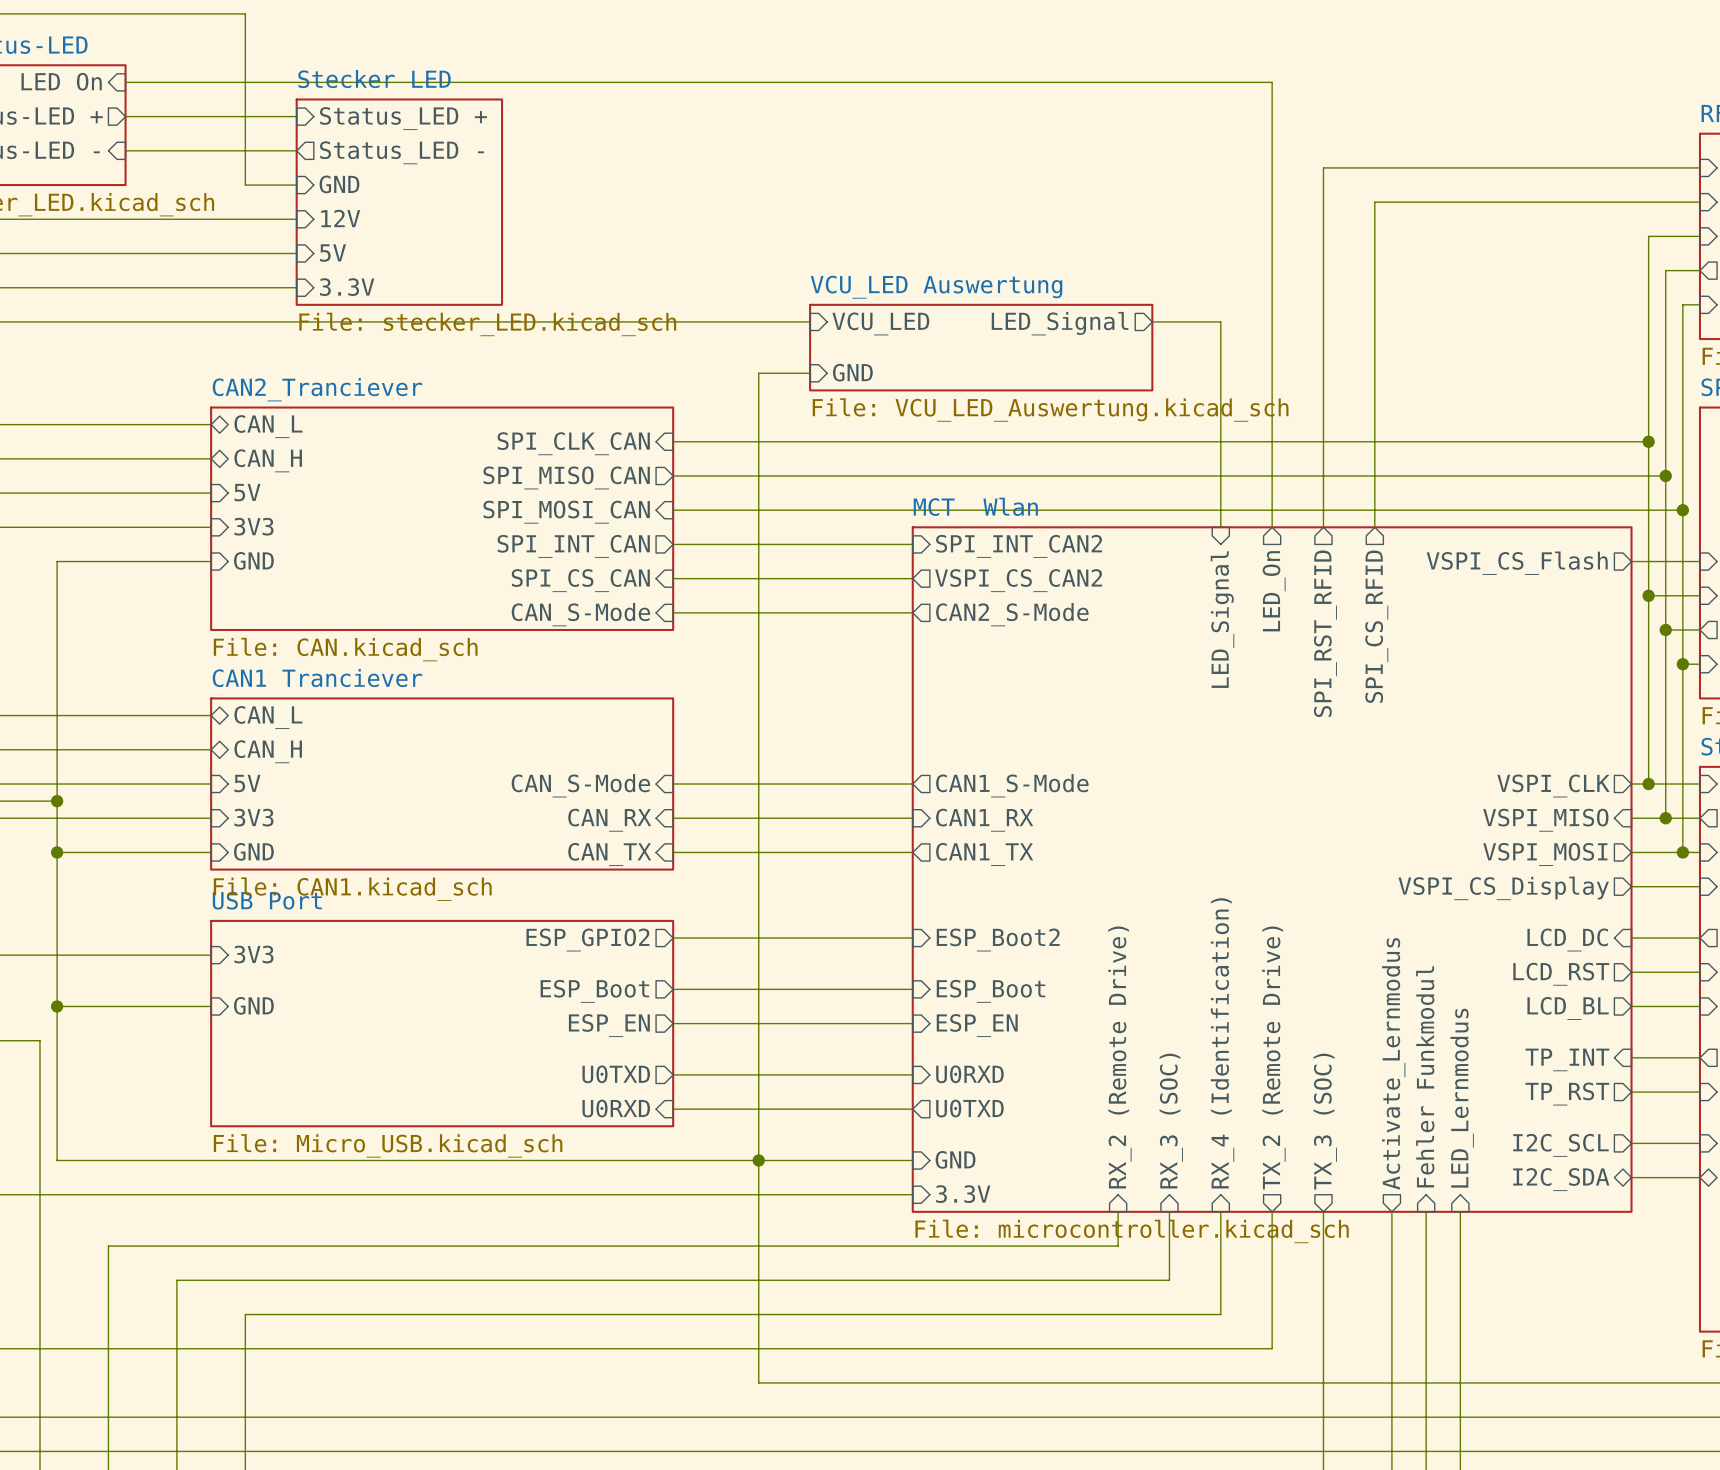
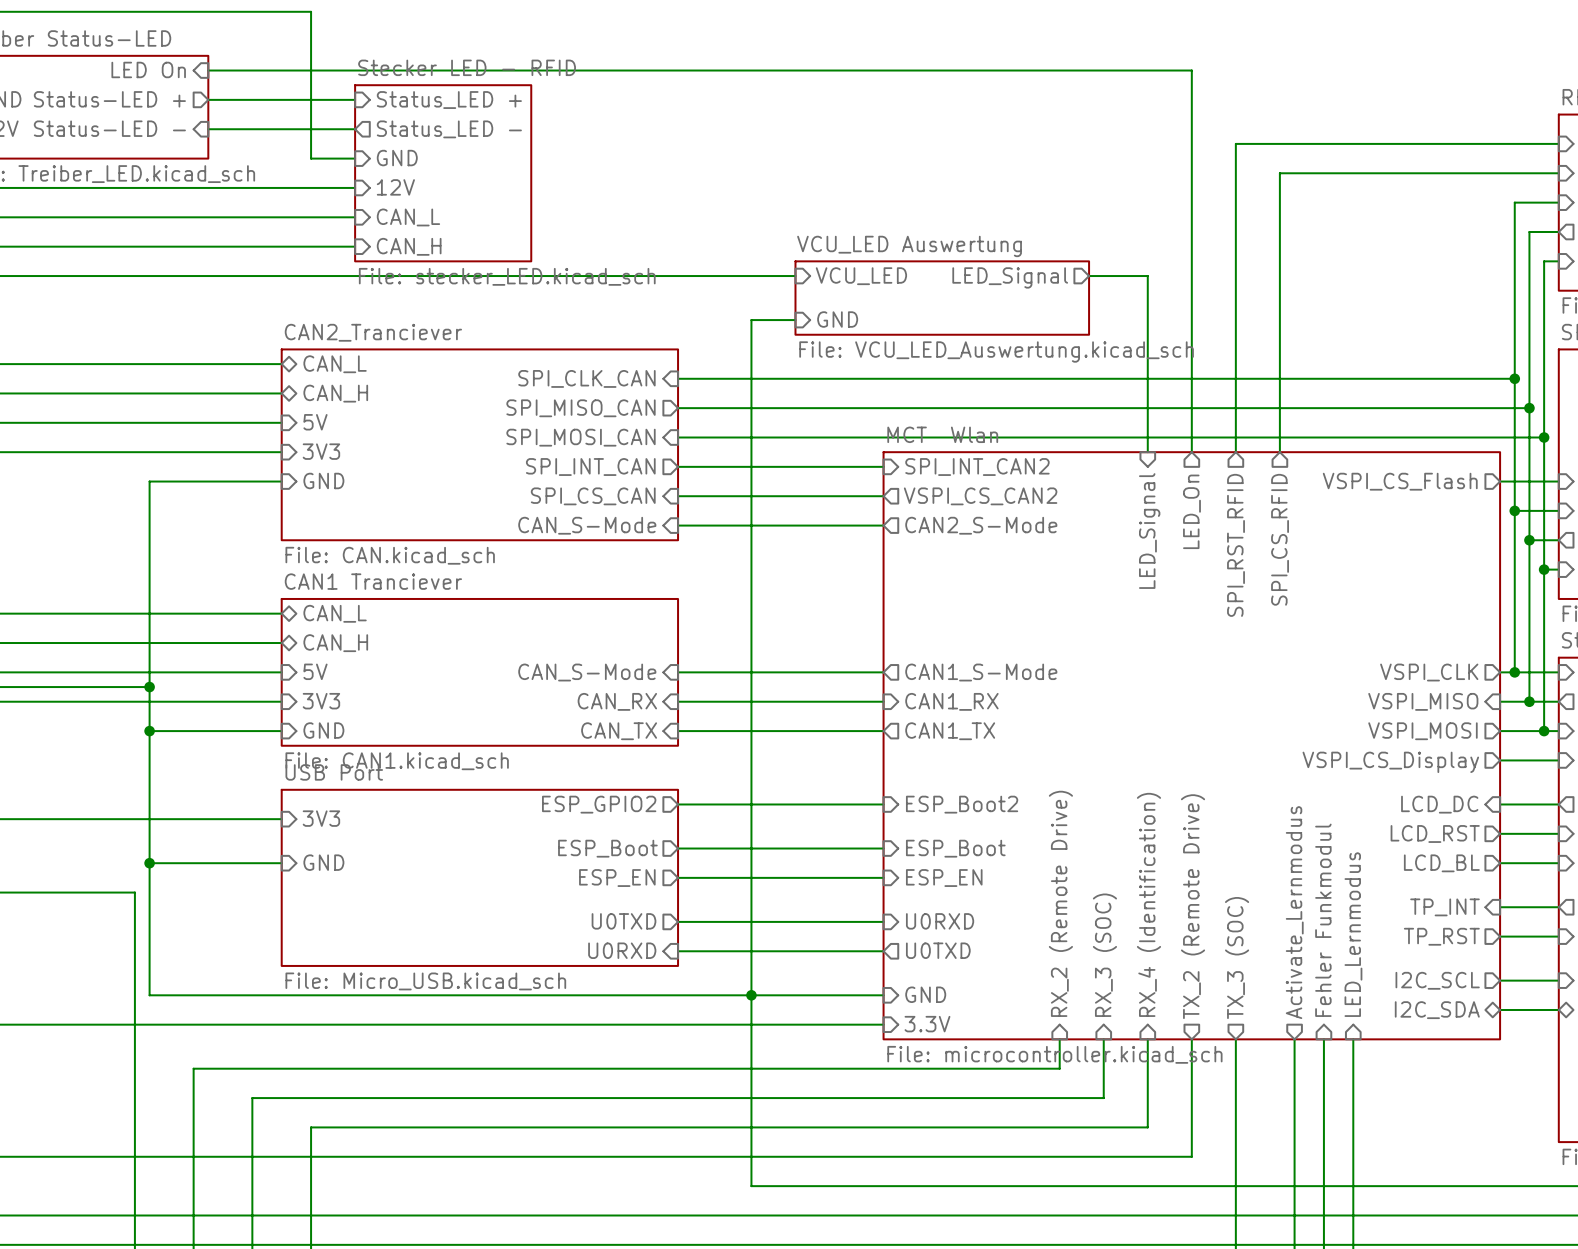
sheet Stecker LED name: Stecker LED (374, 79) -> Stecker LED - RFID (467, 67)
sheet pin: 5V (333, 253) -> CAN_L (408, 217)
sheet pin: 3.3V (347, 287) -> CAN_H (409, 246)

